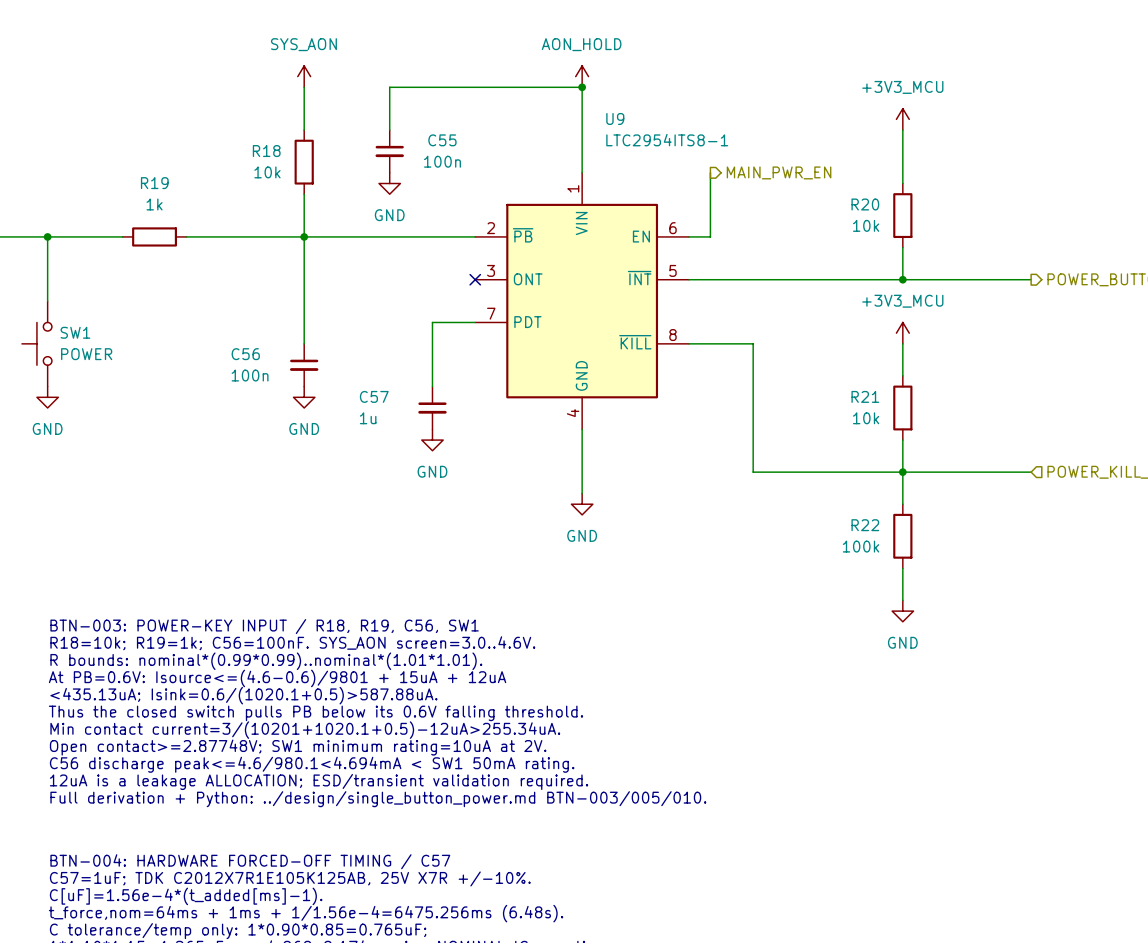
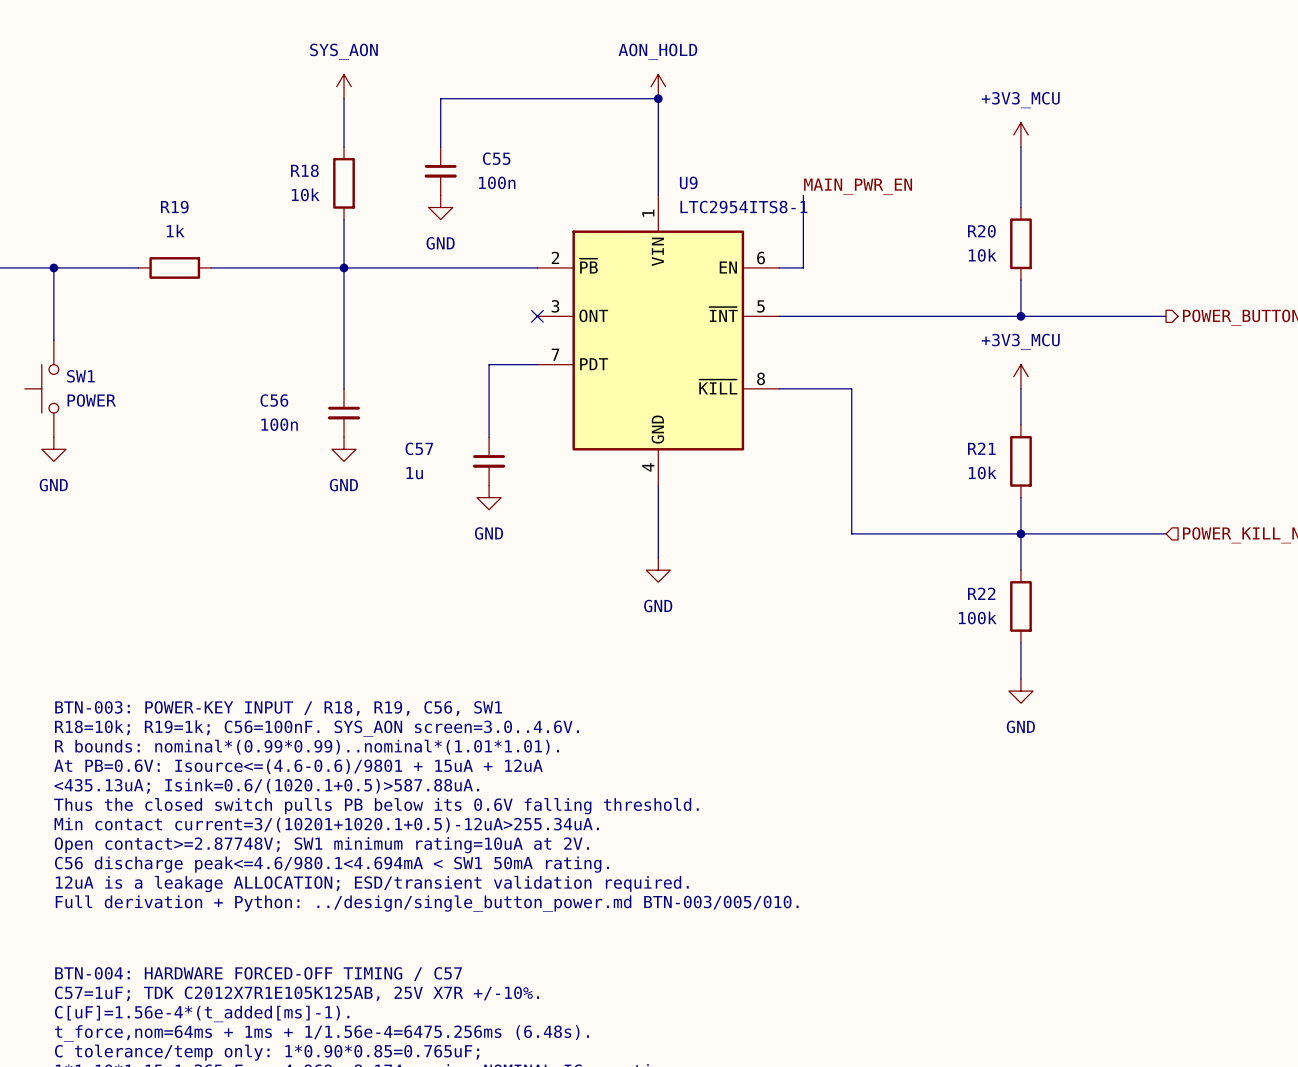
U9 name position: U9 (615, 118) -> U9 (688, 182)
U9 value position: LTC2954ITS8-1 (667, 140) -> LTC2954ITS8-1 (743, 207)
label: none -> MAIN_PWR_EN (858, 186)
hierarchical label: MAIN_PWR_EN (779, 172) -> none

